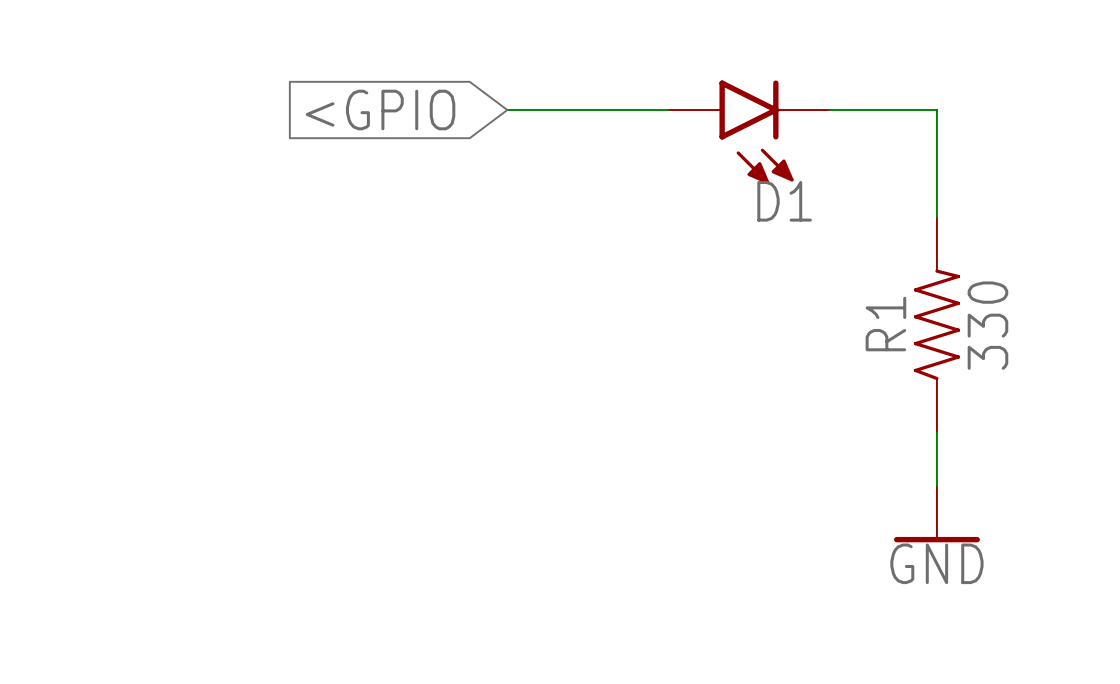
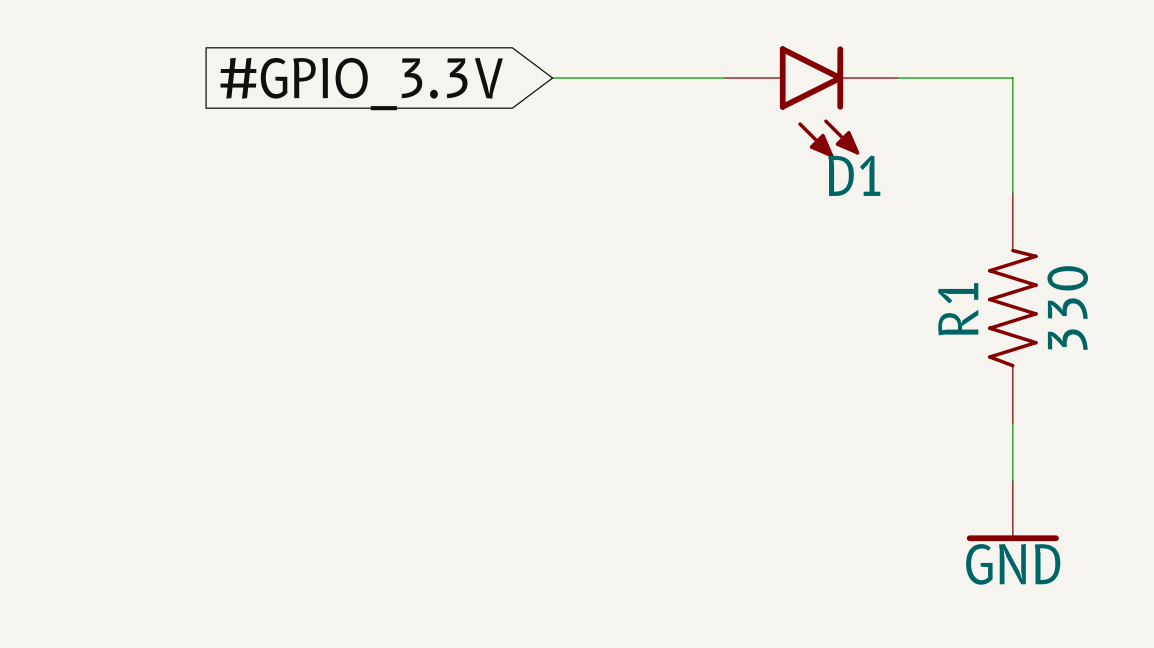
global label: <GPIO (380, 110) -> #GPIO_3.3V (361, 84)

